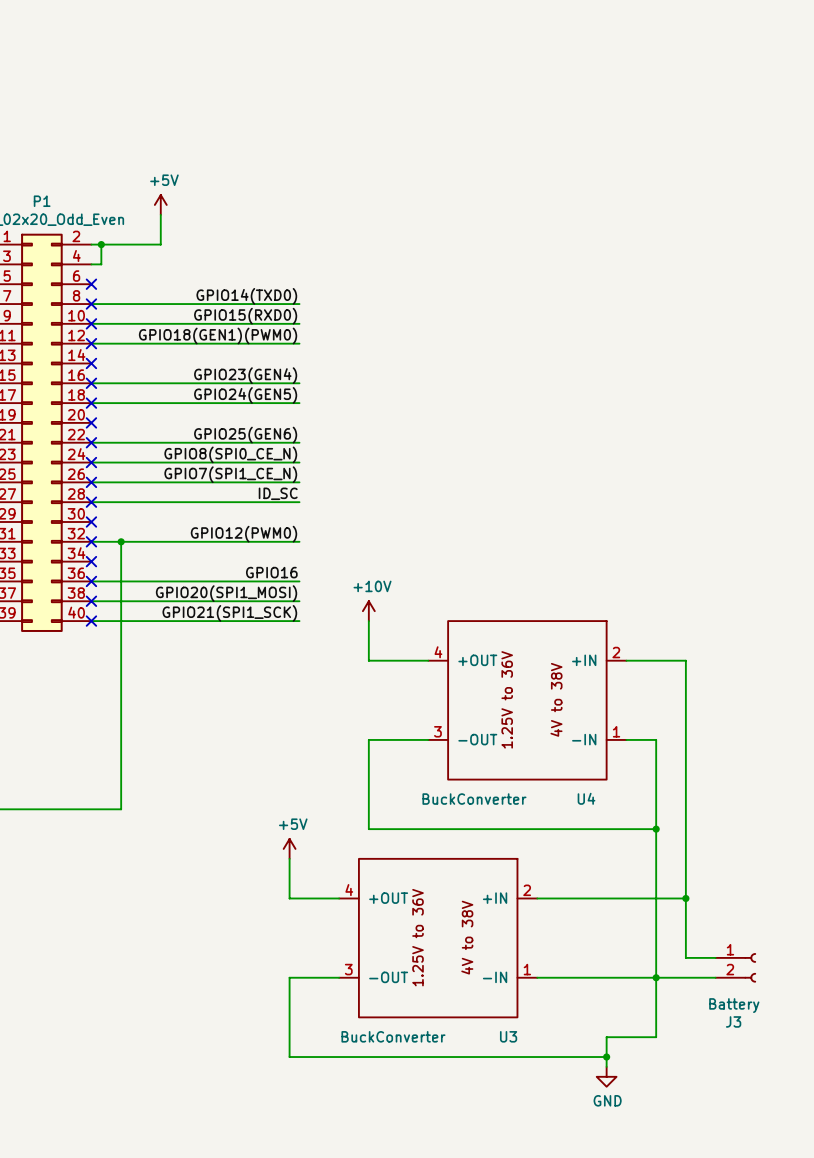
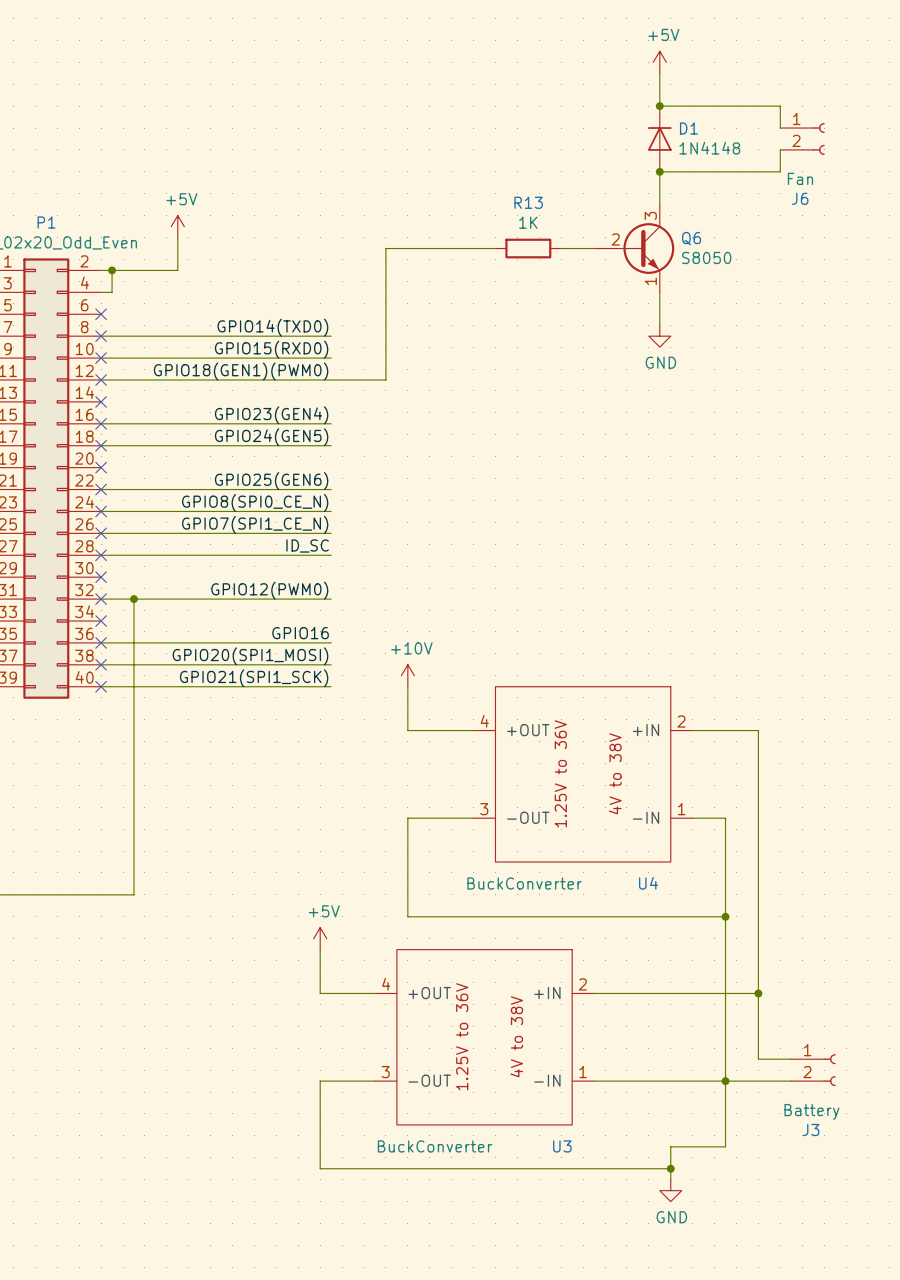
power symbol: none -> +5V (659, 62)
wire: none -> (659, 73) (659, 106) (780, 106) (780, 128)
junction: none -> (659, 106)
D1: none -> 1N4148 (659, 138)
J6: none -> Fan (802, 138)
wire: none -> (780, 149) (780, 171) (659, 171) (659, 204)
junction: none -> (659, 171)
wire: none -> (495, 248) (385, 248) (385, 379) (331, 379)
R13: none -> 1K (528, 248)
wire: none -> (561, 248) (594, 248)
Q6: none -> S8050 (634, 248)
wire: none -> (659, 292) (659, 325)
power symbol: none -> GND (659, 336)

